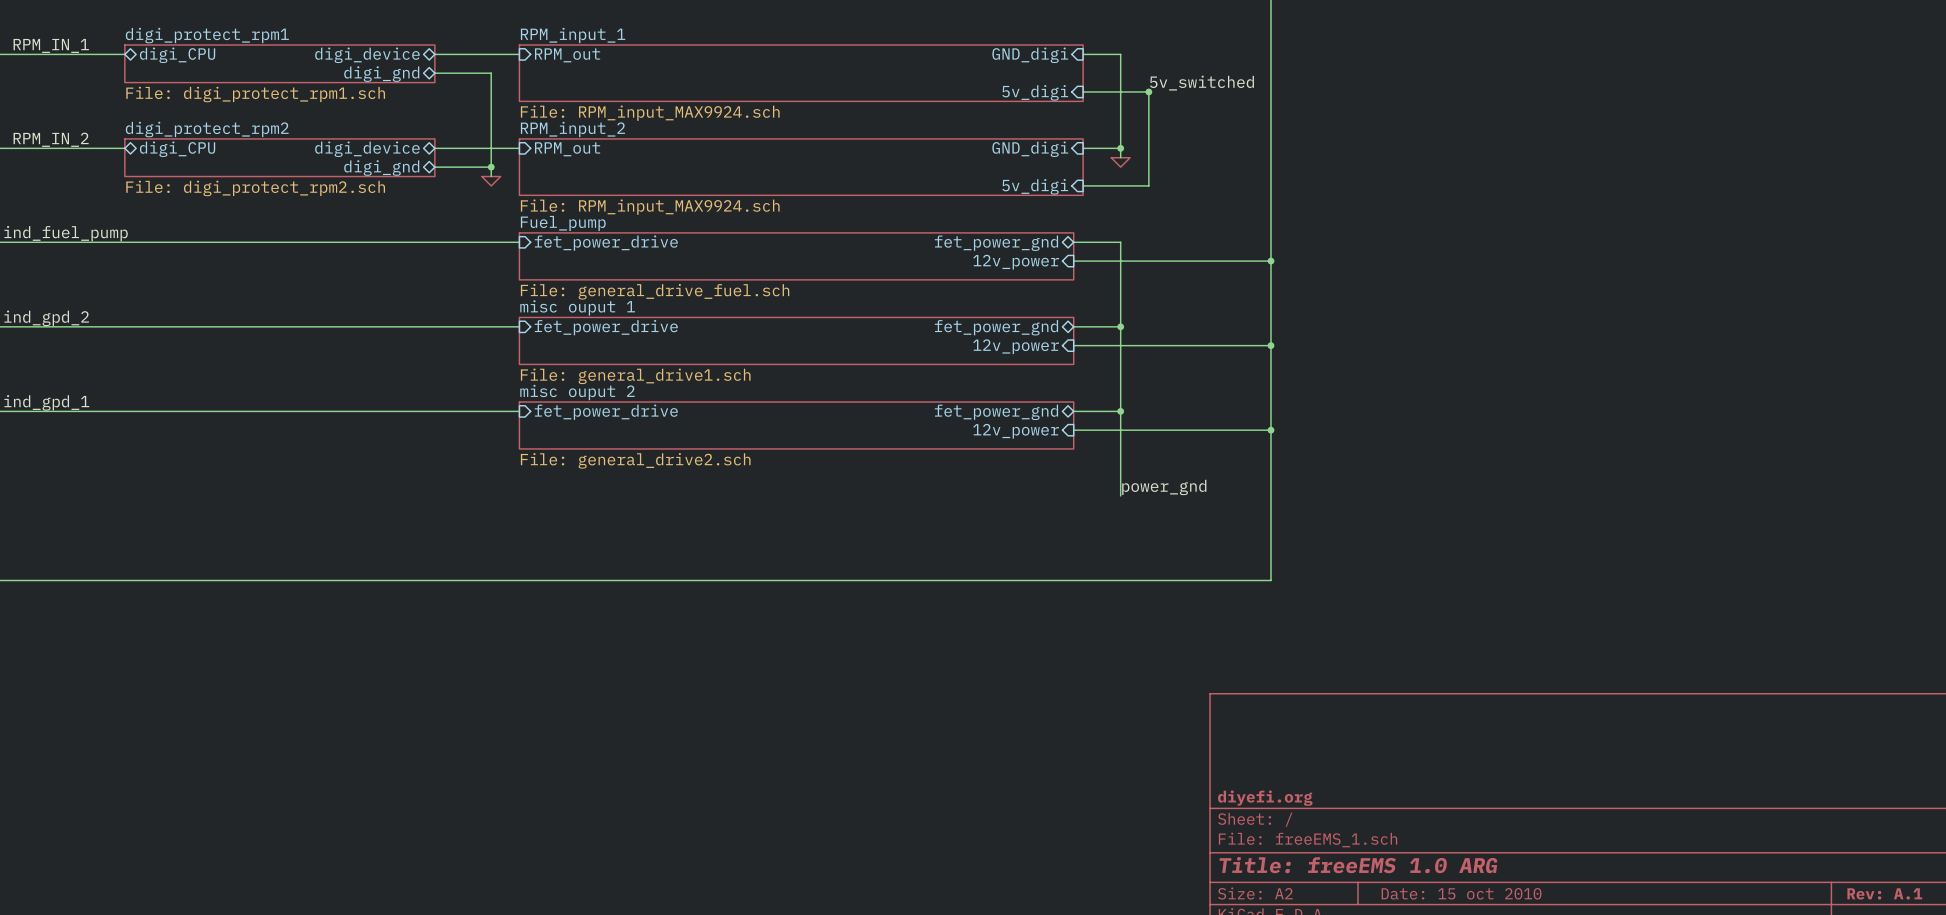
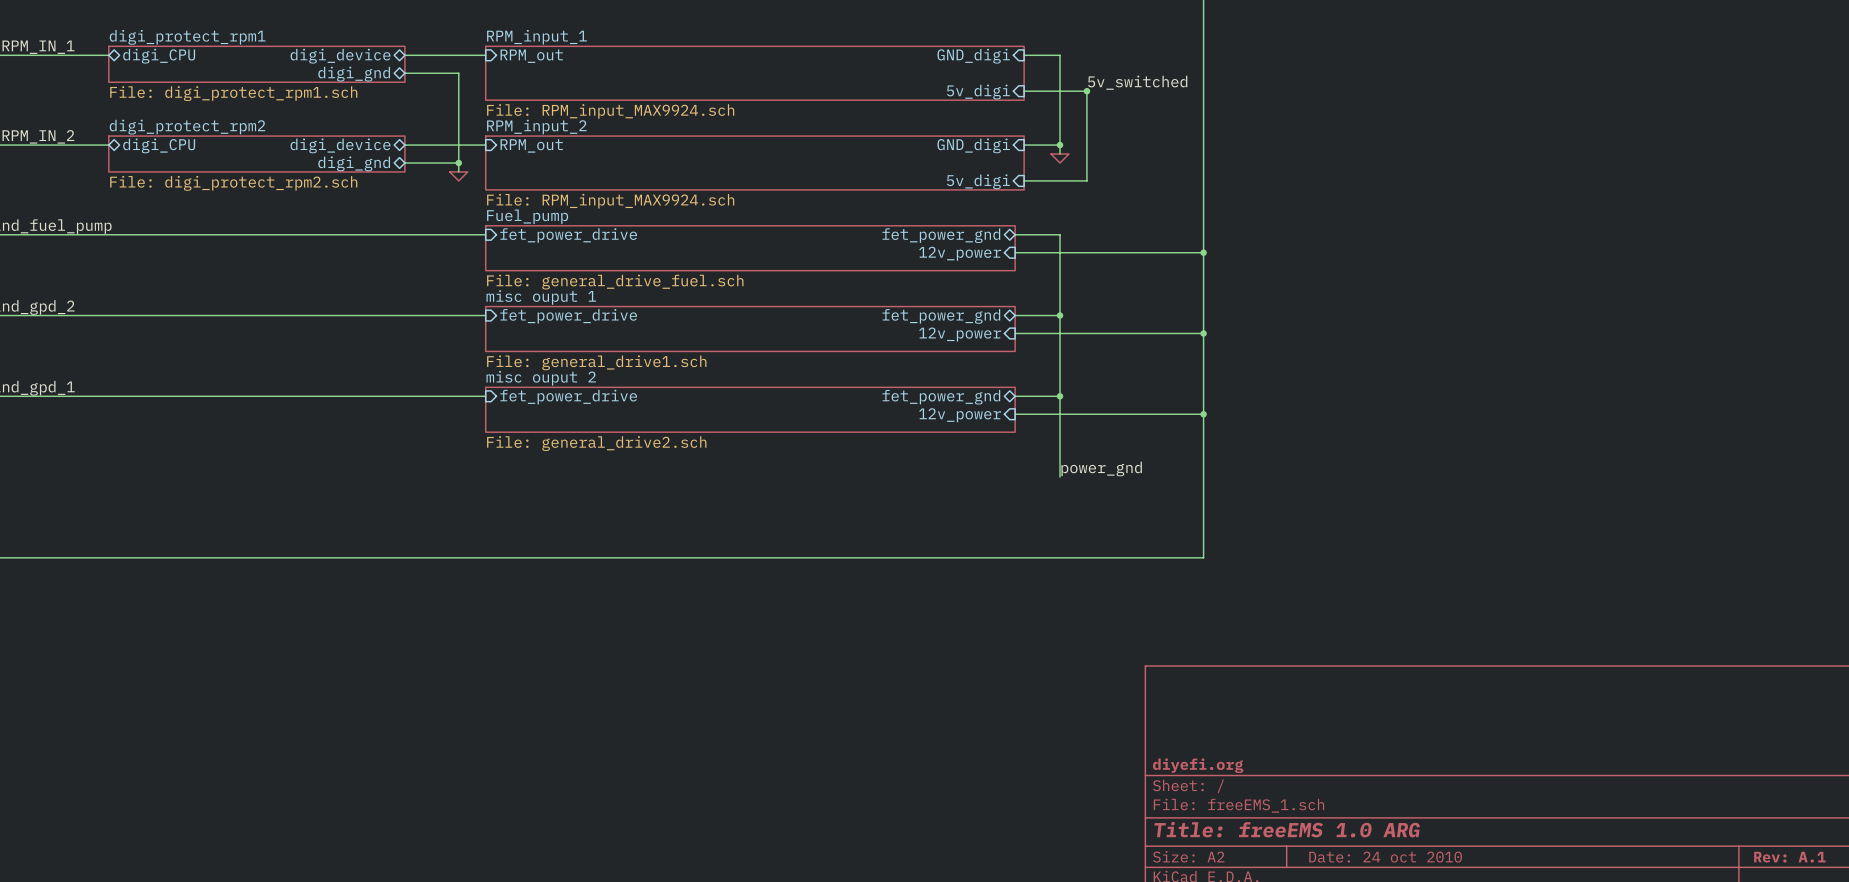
title block: Date: 15 oct 2010 (1461, 893) -> Date: 24 oct 2010 (1385, 857)

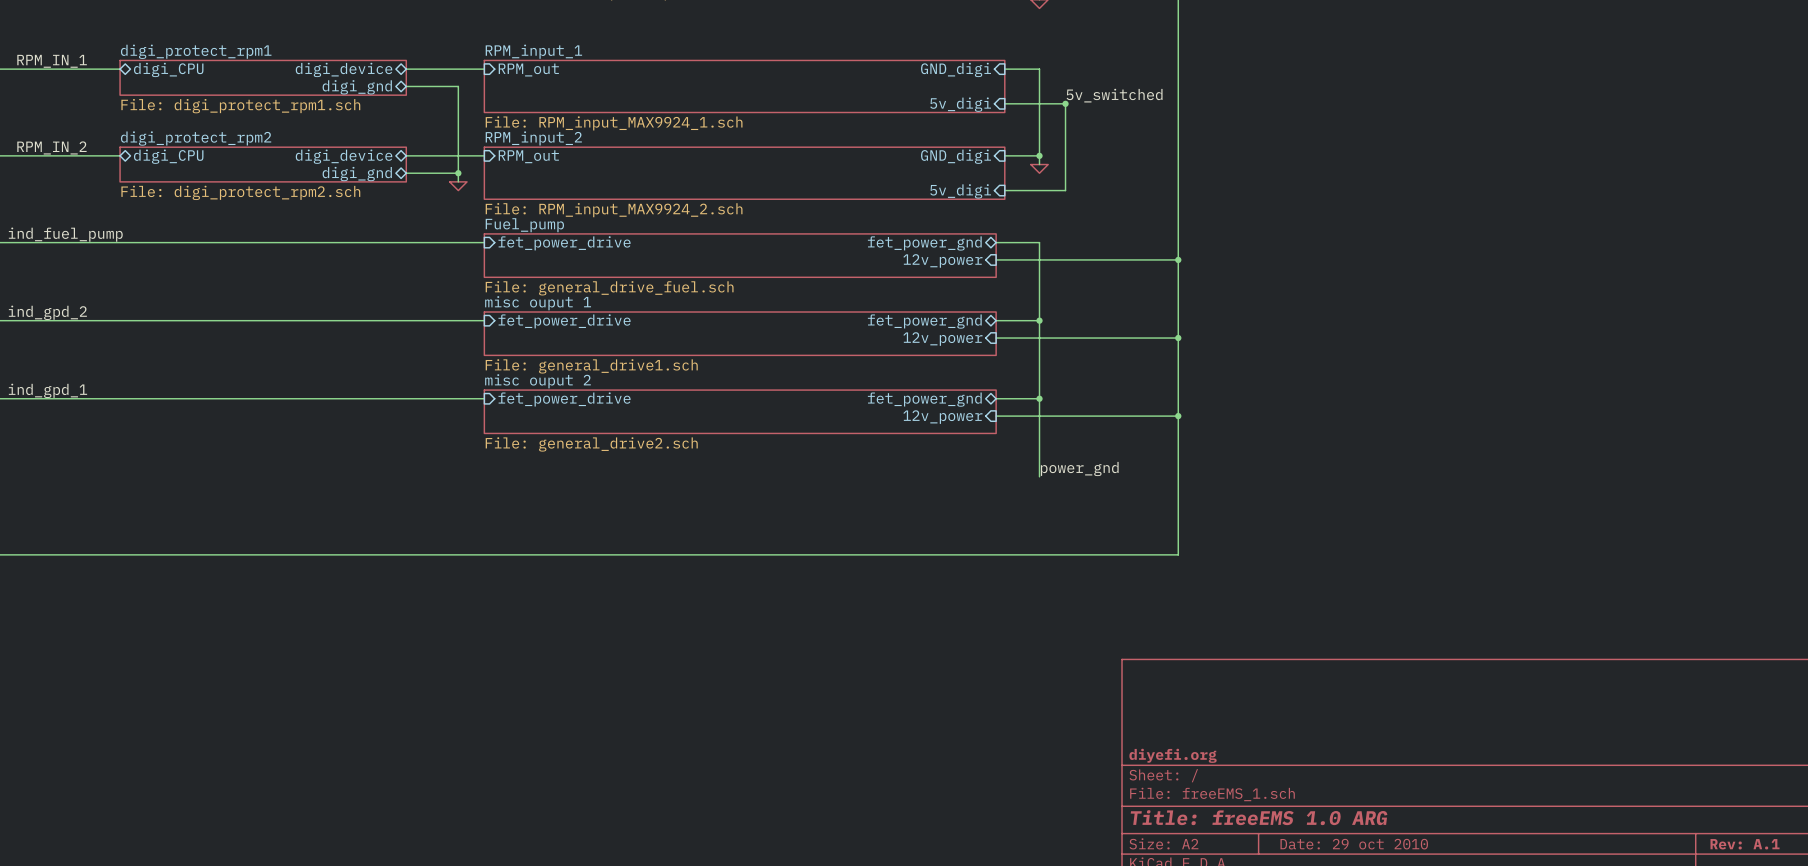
sheet RPM_input_1 value: File: RPM_input_MAX9924.sch (610, 111) -> File: RPM_input_MAX9924_1.sch (614, 123)
sheet RPM_input_2 value: File: RPM_input_MAX9924.sch (610, 201) -> File: RPM_input_MAX9924_2.sch (614, 210)
title block: Date: 24 oct 2010 (1385, 857) -> Date: 29 oct 2010 (1354, 844)

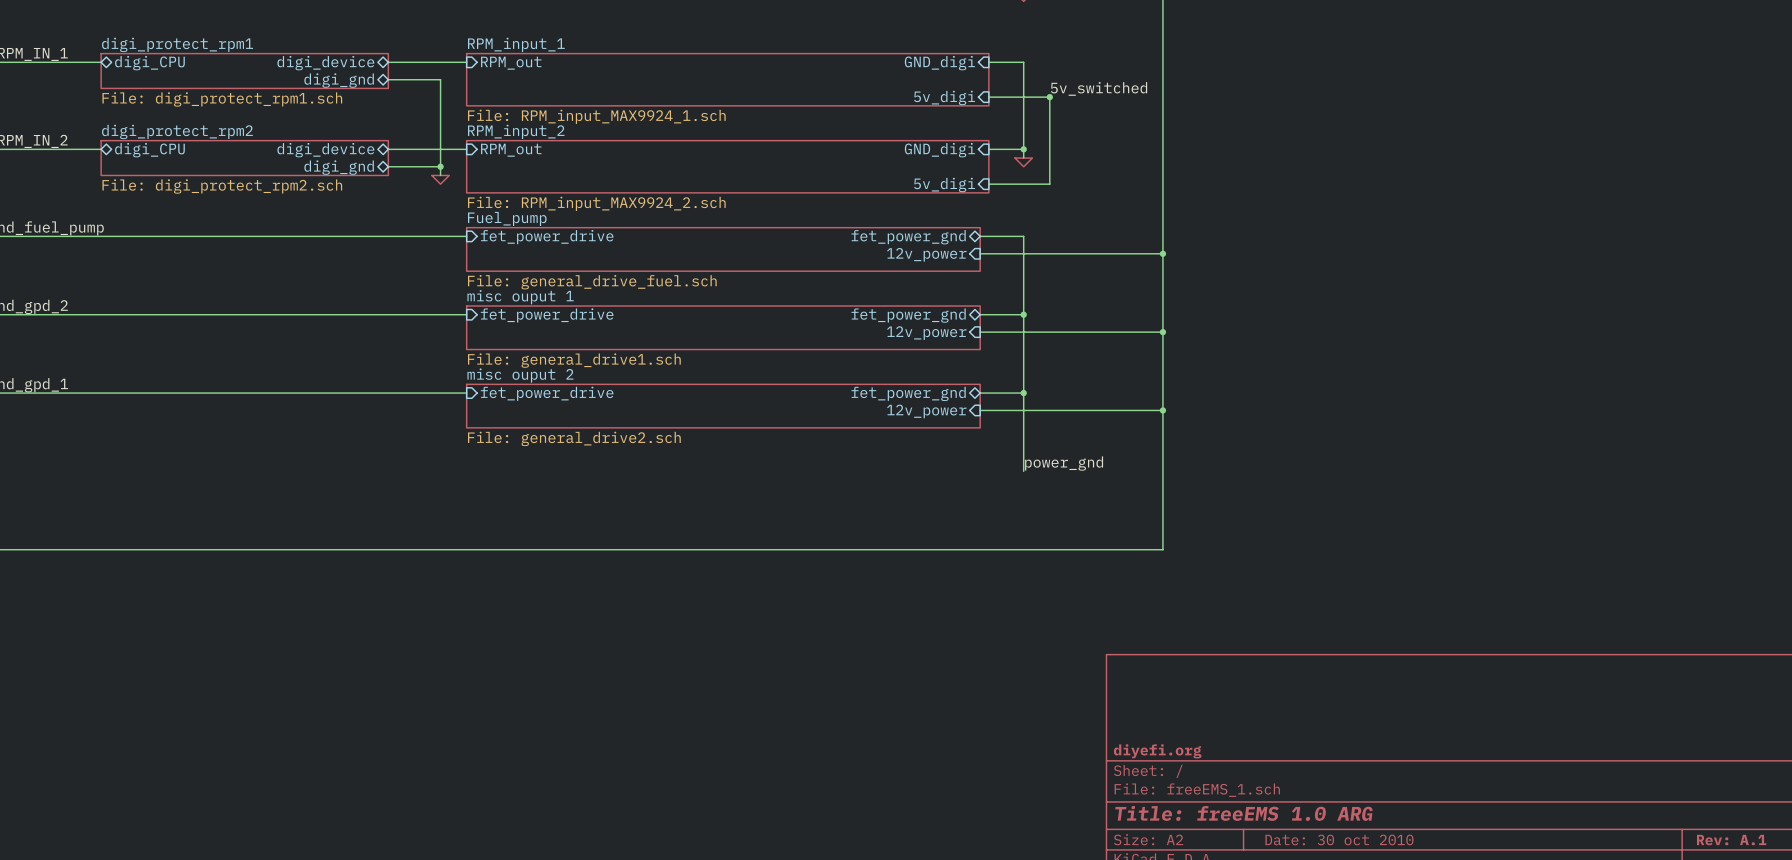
title block: Date: 29 oct 2010 (1354, 844) -> Date: 30 oct 2010 (1339, 839)

